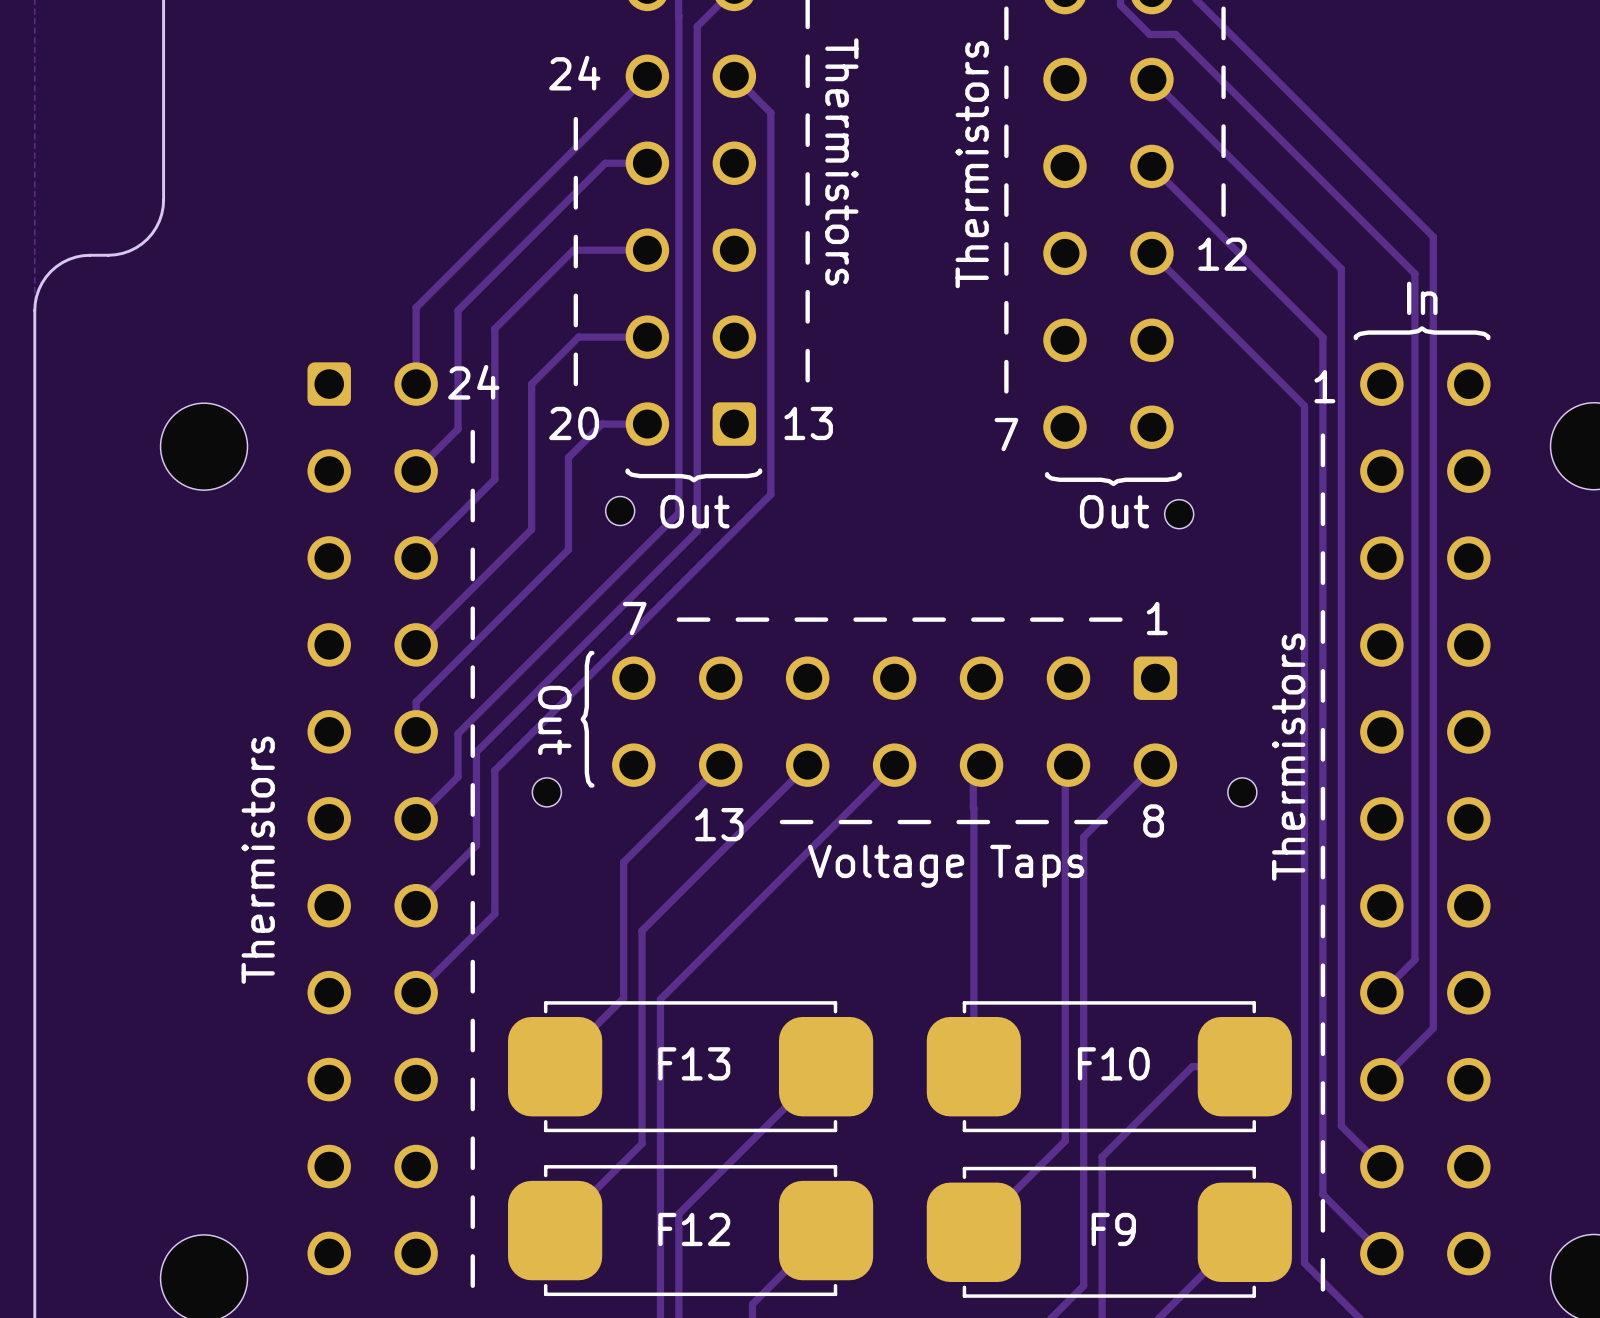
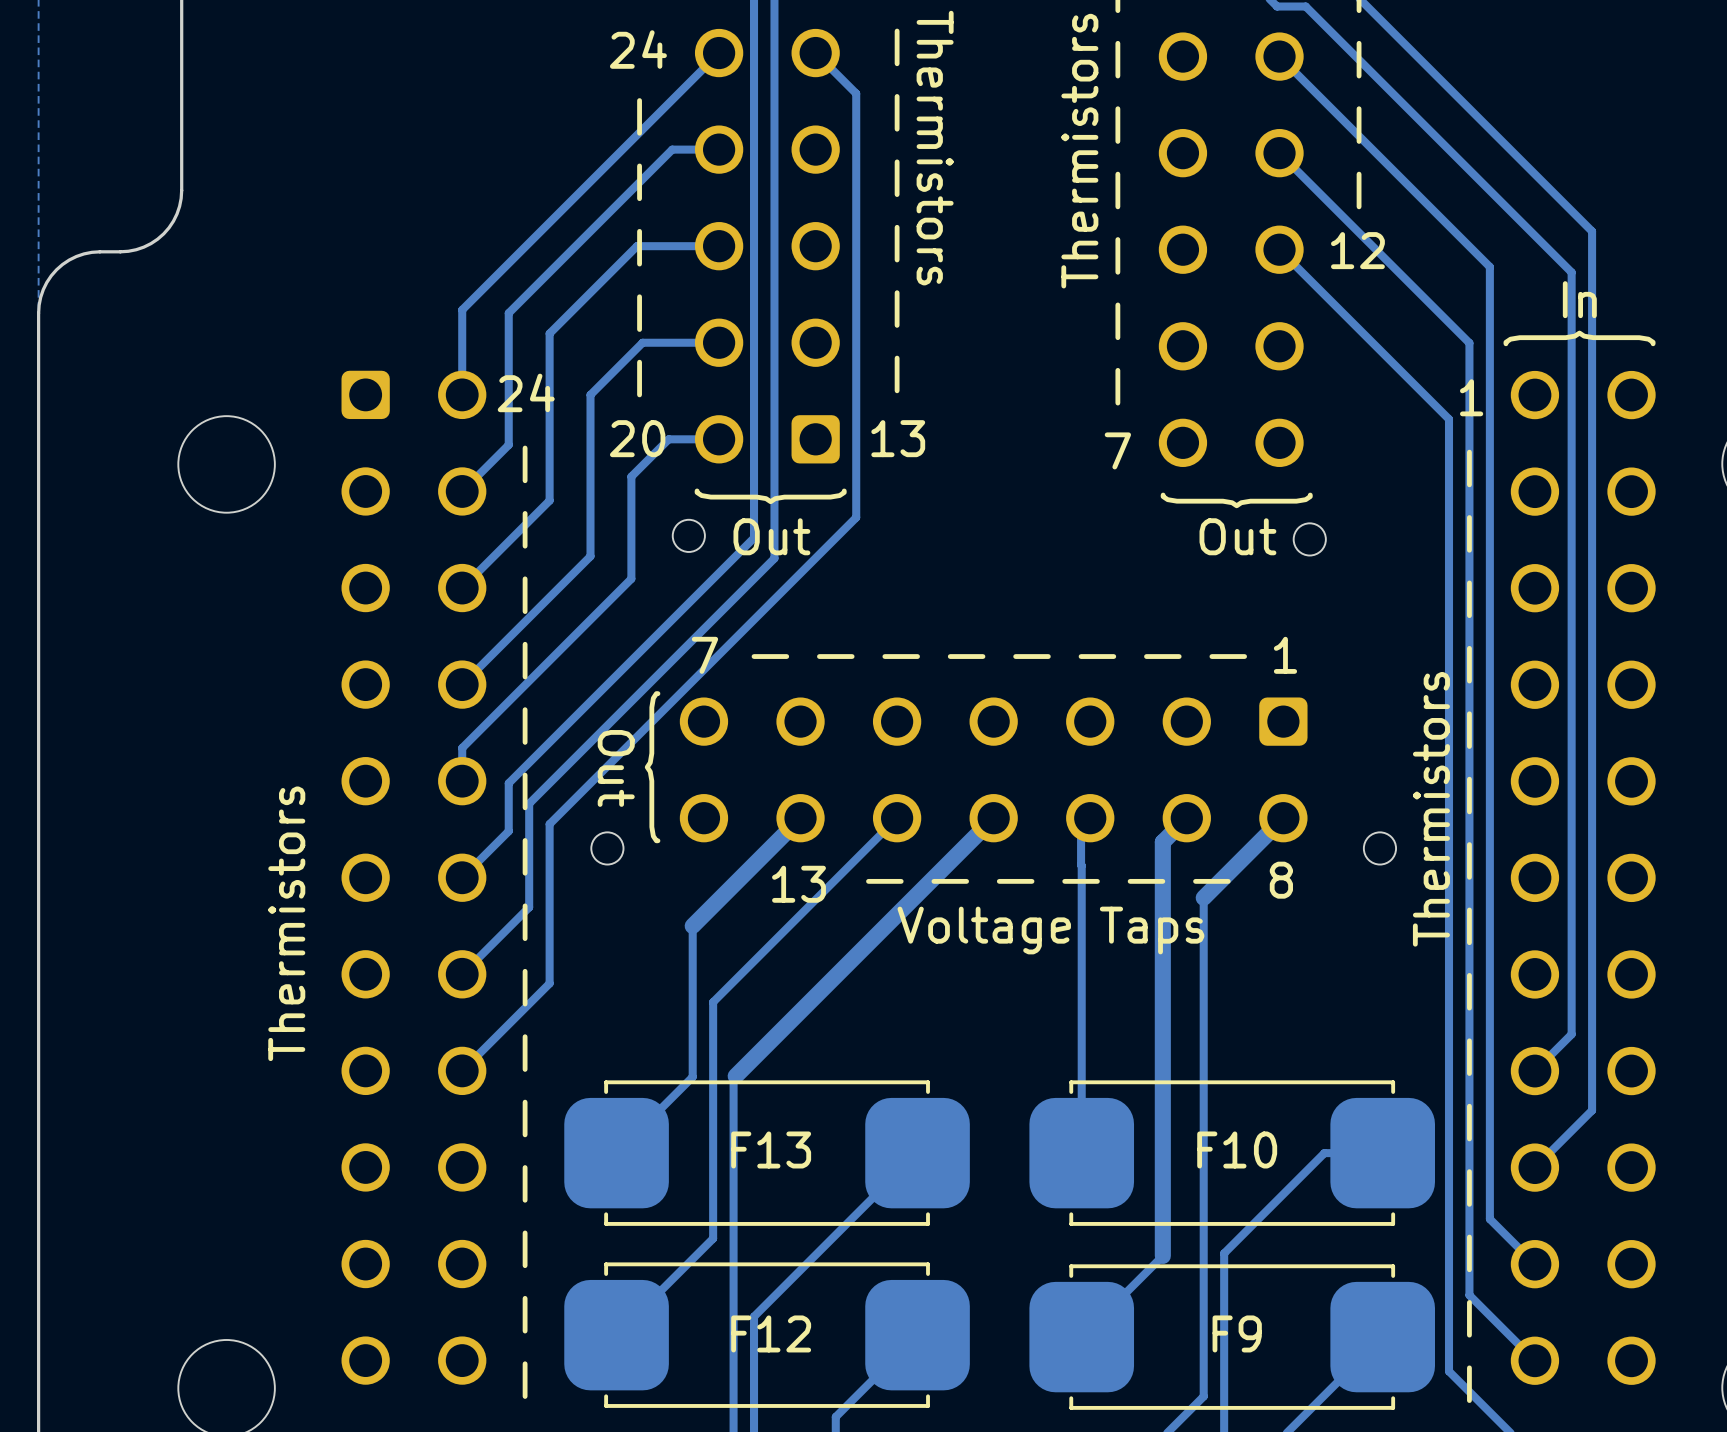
track width: thin (720, 765) (623, 862) -> thick (800, 818) (692, 926)
track width: thin (894, 765) (662, 997) -> thick (993, 818) (735, 1076)
track width: thin (1155, 765) (1083, 836) -> thick (1283, 818) (1203, 897)
track: (1065, 768) (1065, 1140) (1046, 1159) -> (1183, 821) (1162, 842) (1162, 1255)

